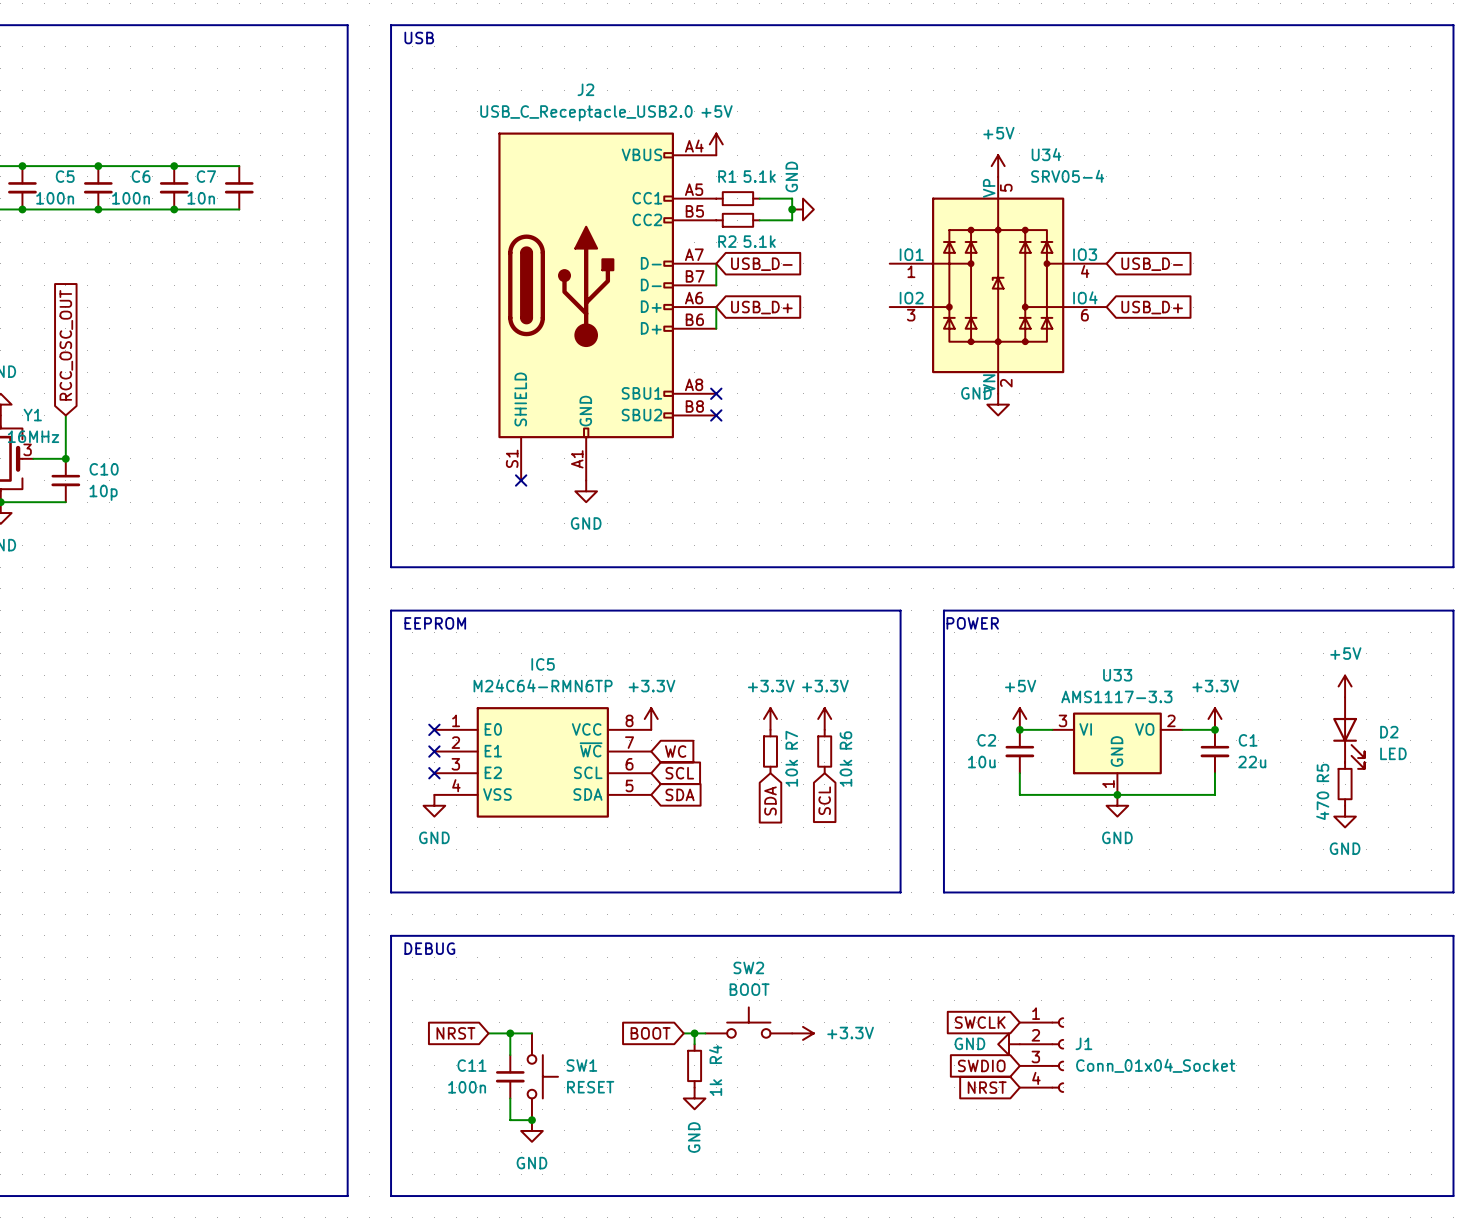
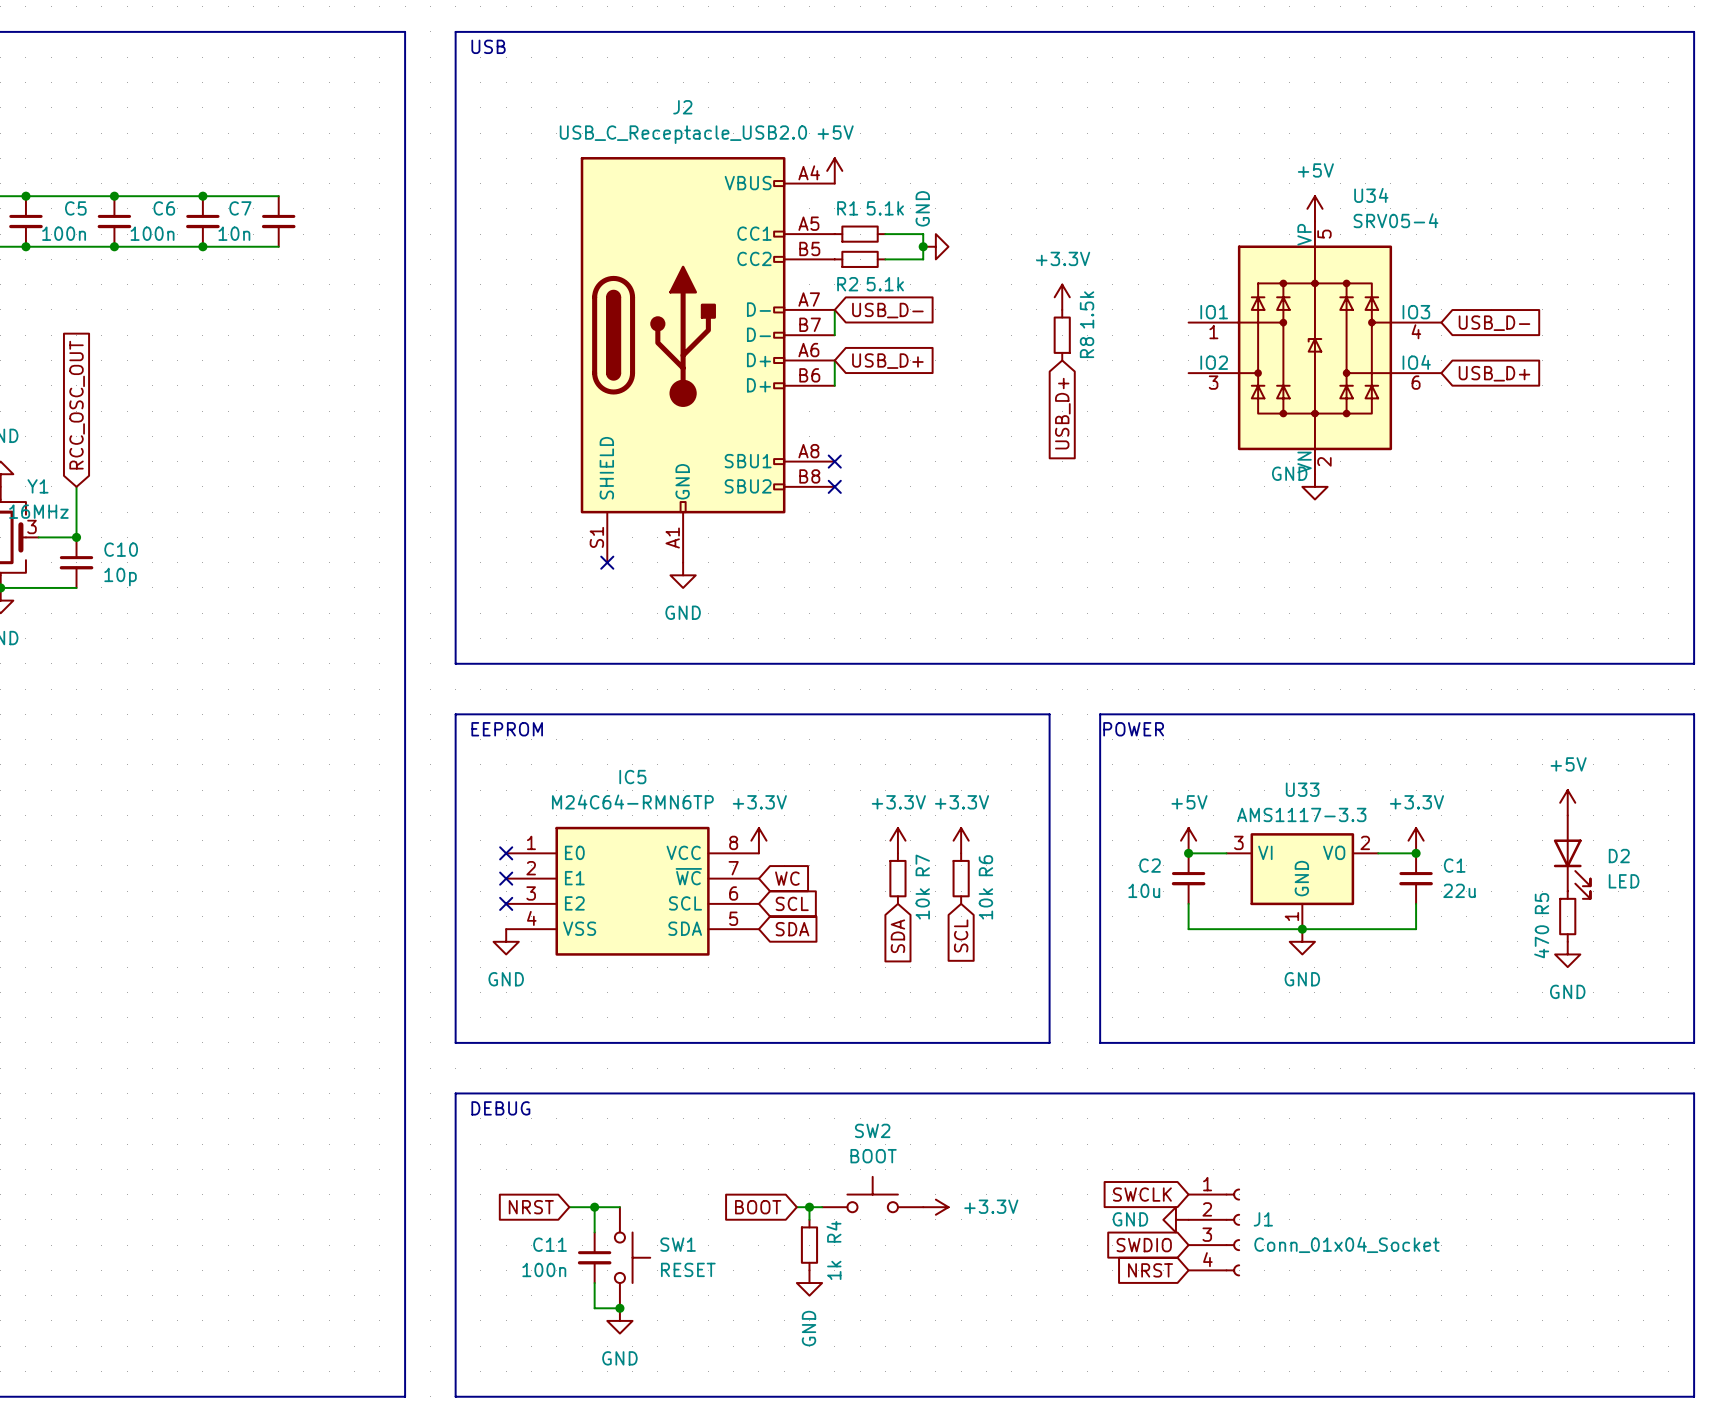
power symbol position: +5V (998, 166) -> +5V (1314, 208)
power symbol: none -> +3.3V (1062, 297)
global label position: USB_D- (1152, 264) -> USB_D- (1494, 323)
R8: none -> 1.5k (1062, 335)
U34 position: (998, 285) -> (1314, 347)
global label: USB_D+ (1152, 307) -> none
global label: none -> USB_D+ (1494, 373)
global label: none -> USB_D+ (1062, 413)
power symbol position: GND (998, 404) -> GND (1314, 486)

